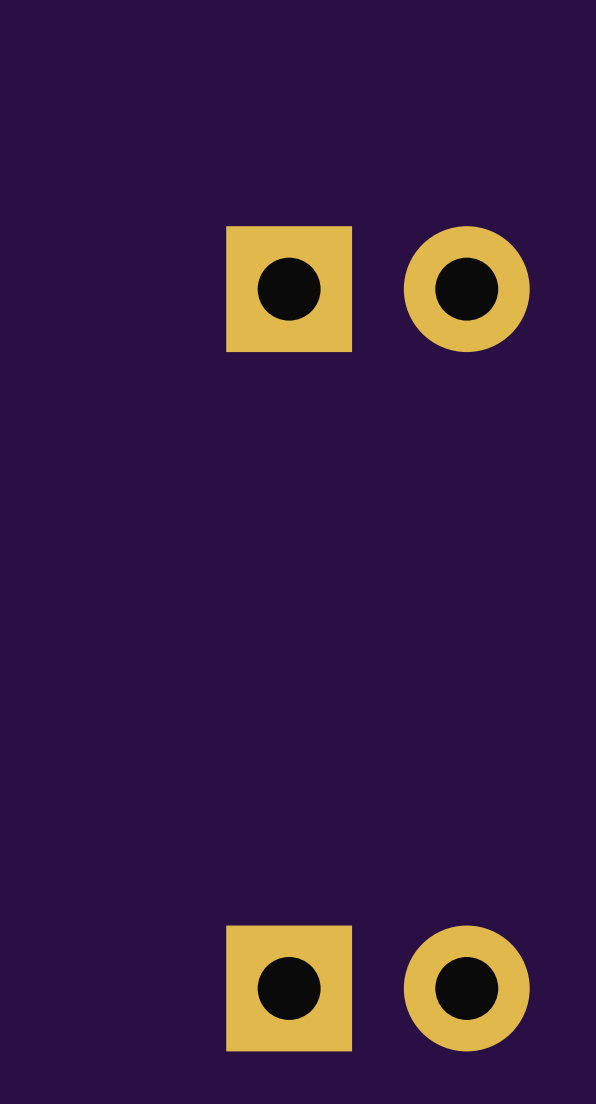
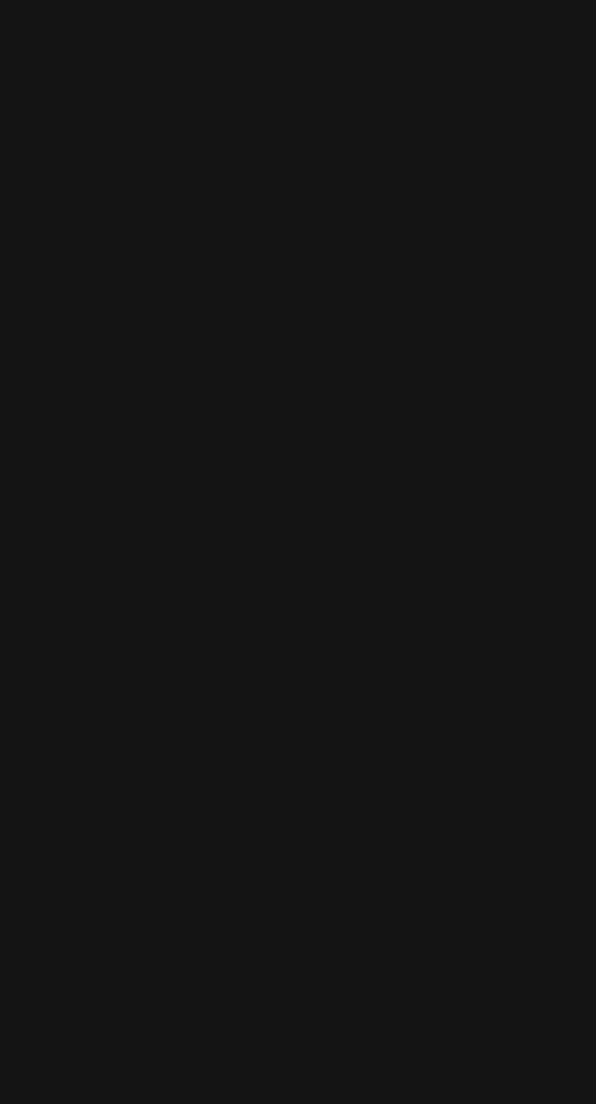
part: (377, 289) -> none
part: (377, 988) -> none

